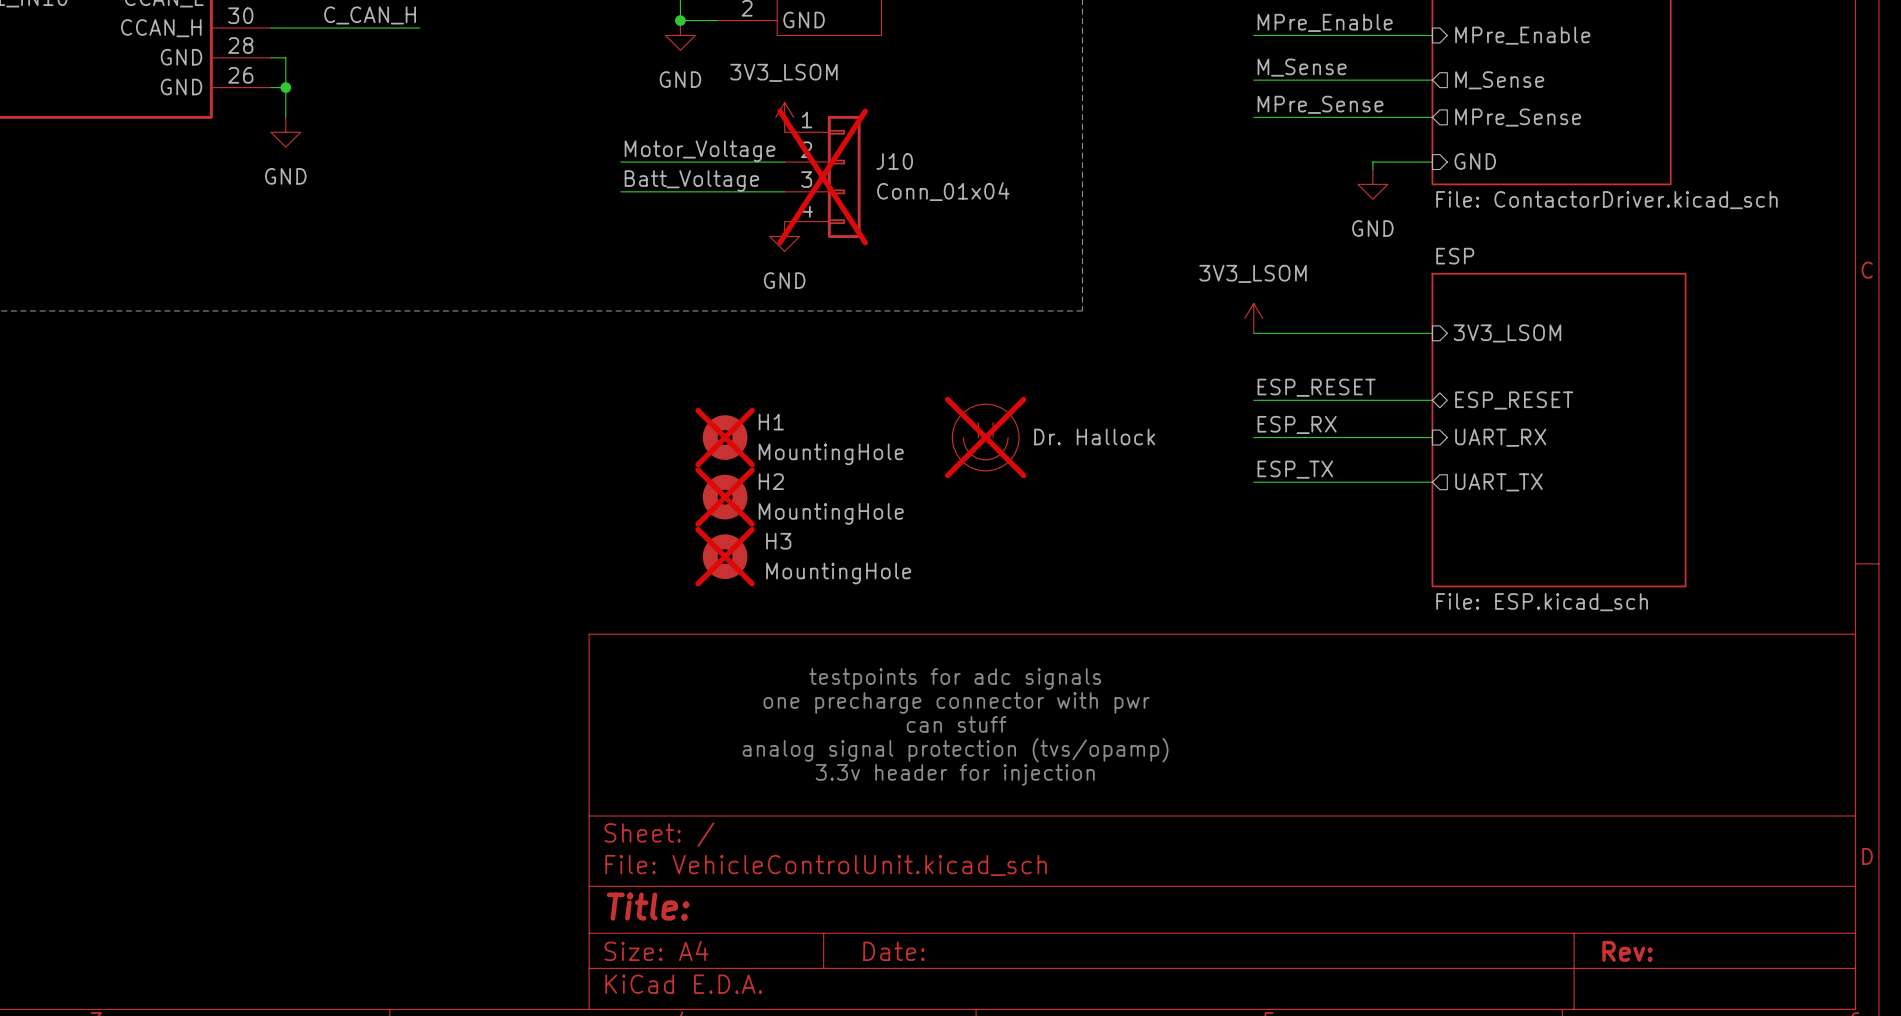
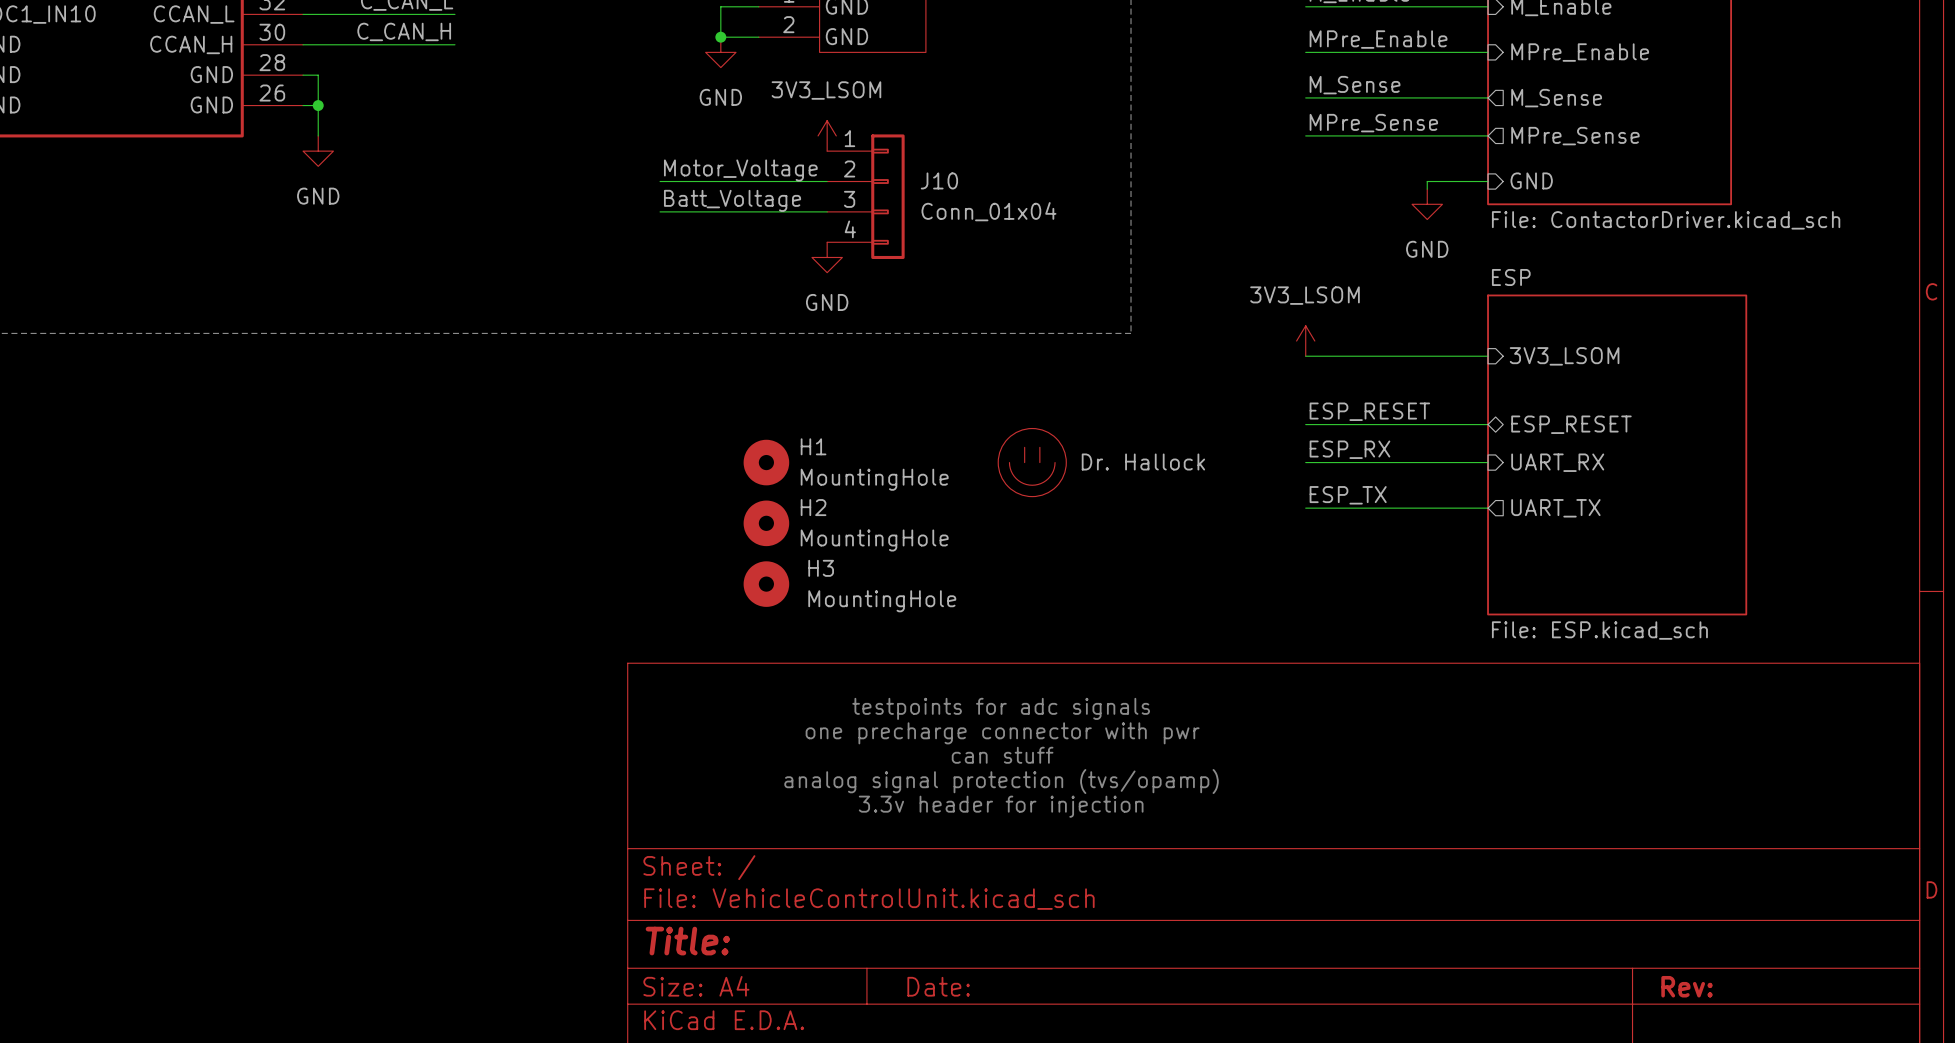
J10 do-not-place cross: (822, 176) -> none
H1 do-not-place cross: (725, 437) -> none
part do-not-place cross: (985, 437) -> none
H2 do-not-place cross: (725, 497) -> none
H3 do-not-place cross: (725, 556) -> none

